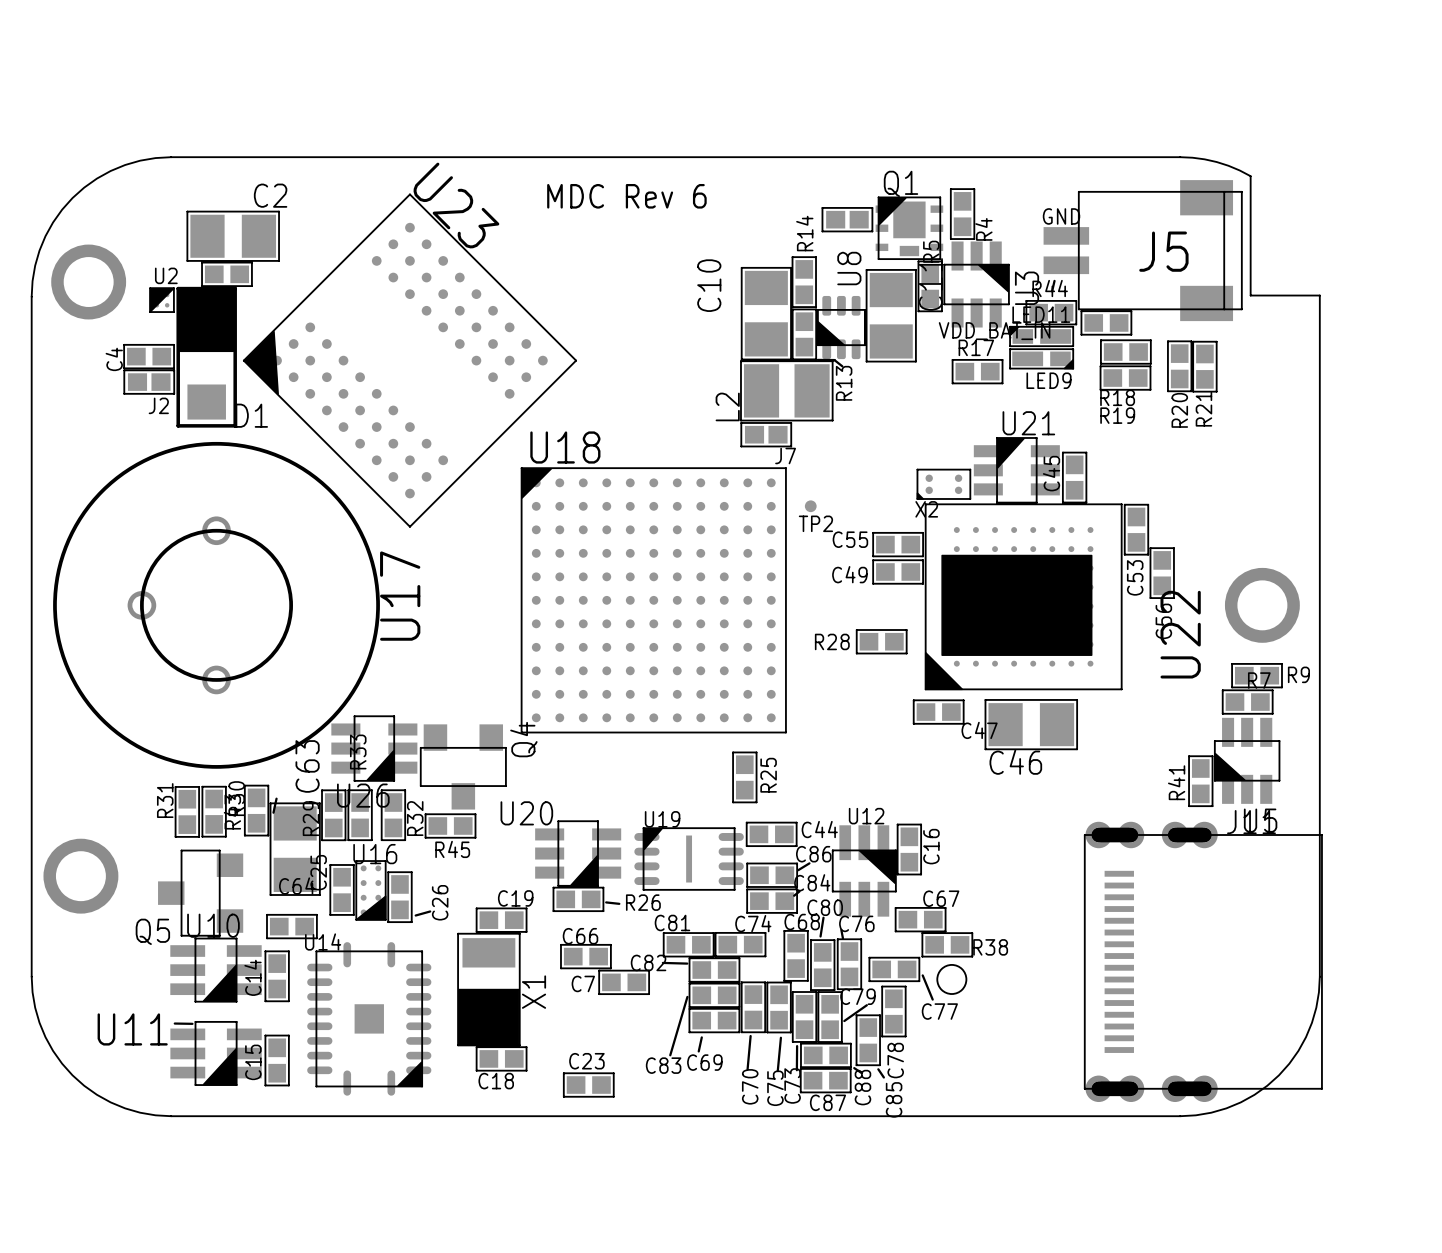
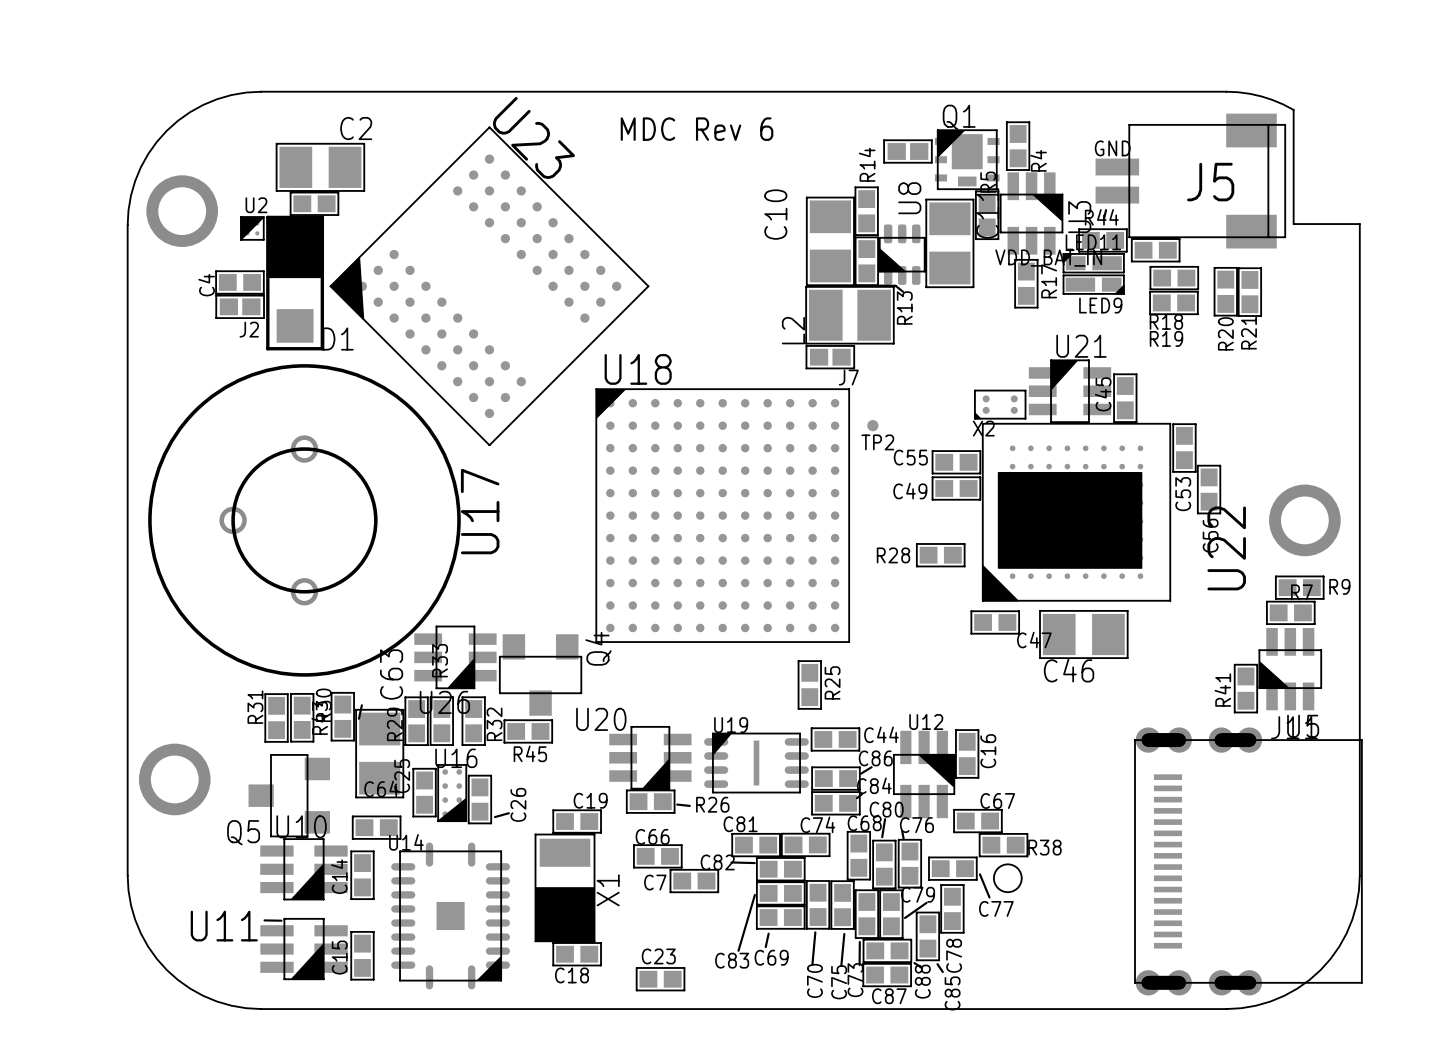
R17 rotation: 0° (977, 371) -> 90° clockwise (1026, 283)

